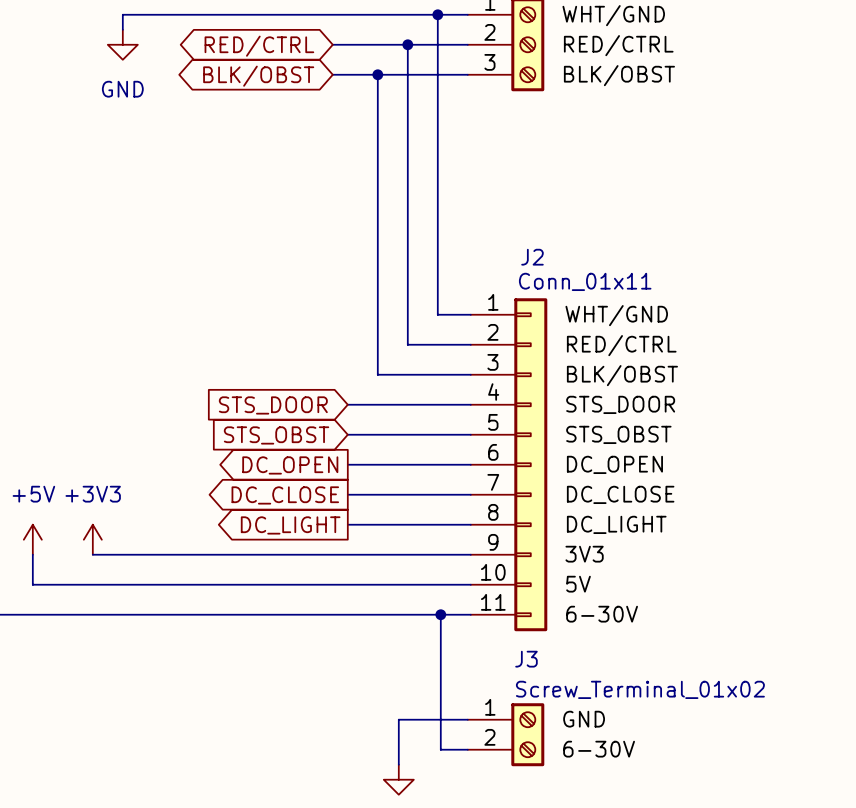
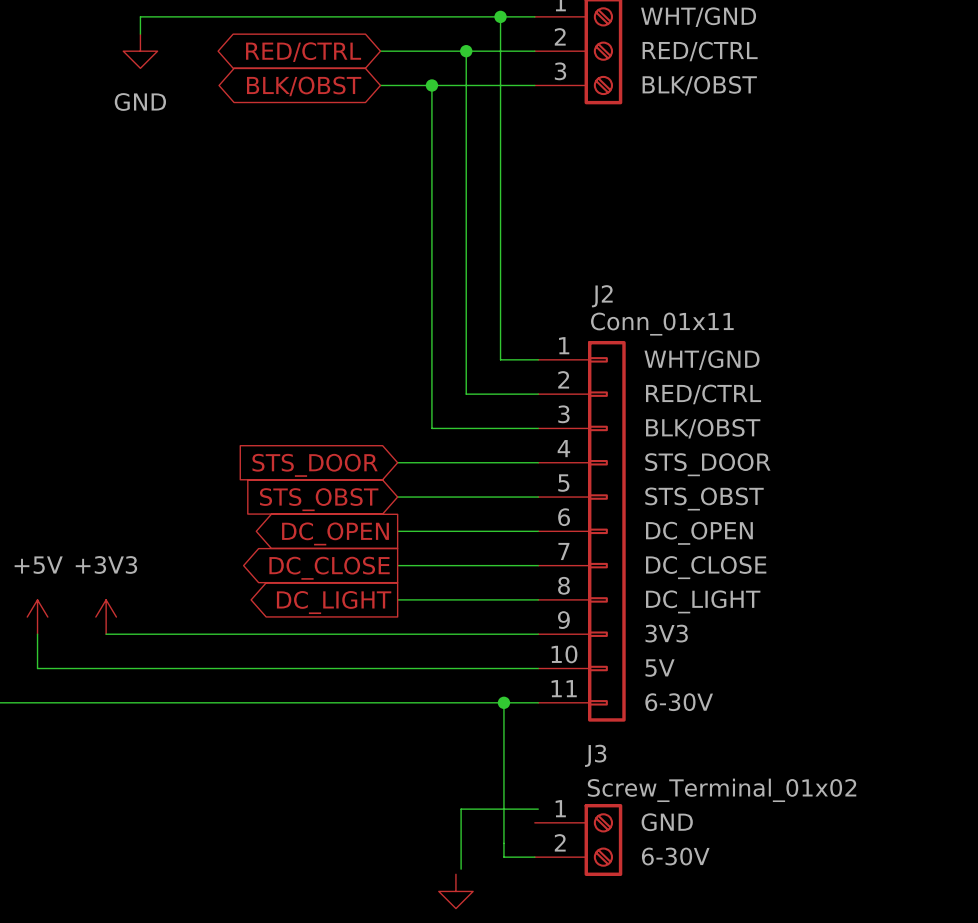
wire: none -> (538, 809) (461, 809) (461, 869)
wire: (467, 719) (398, 719) (398, 764) -> none

